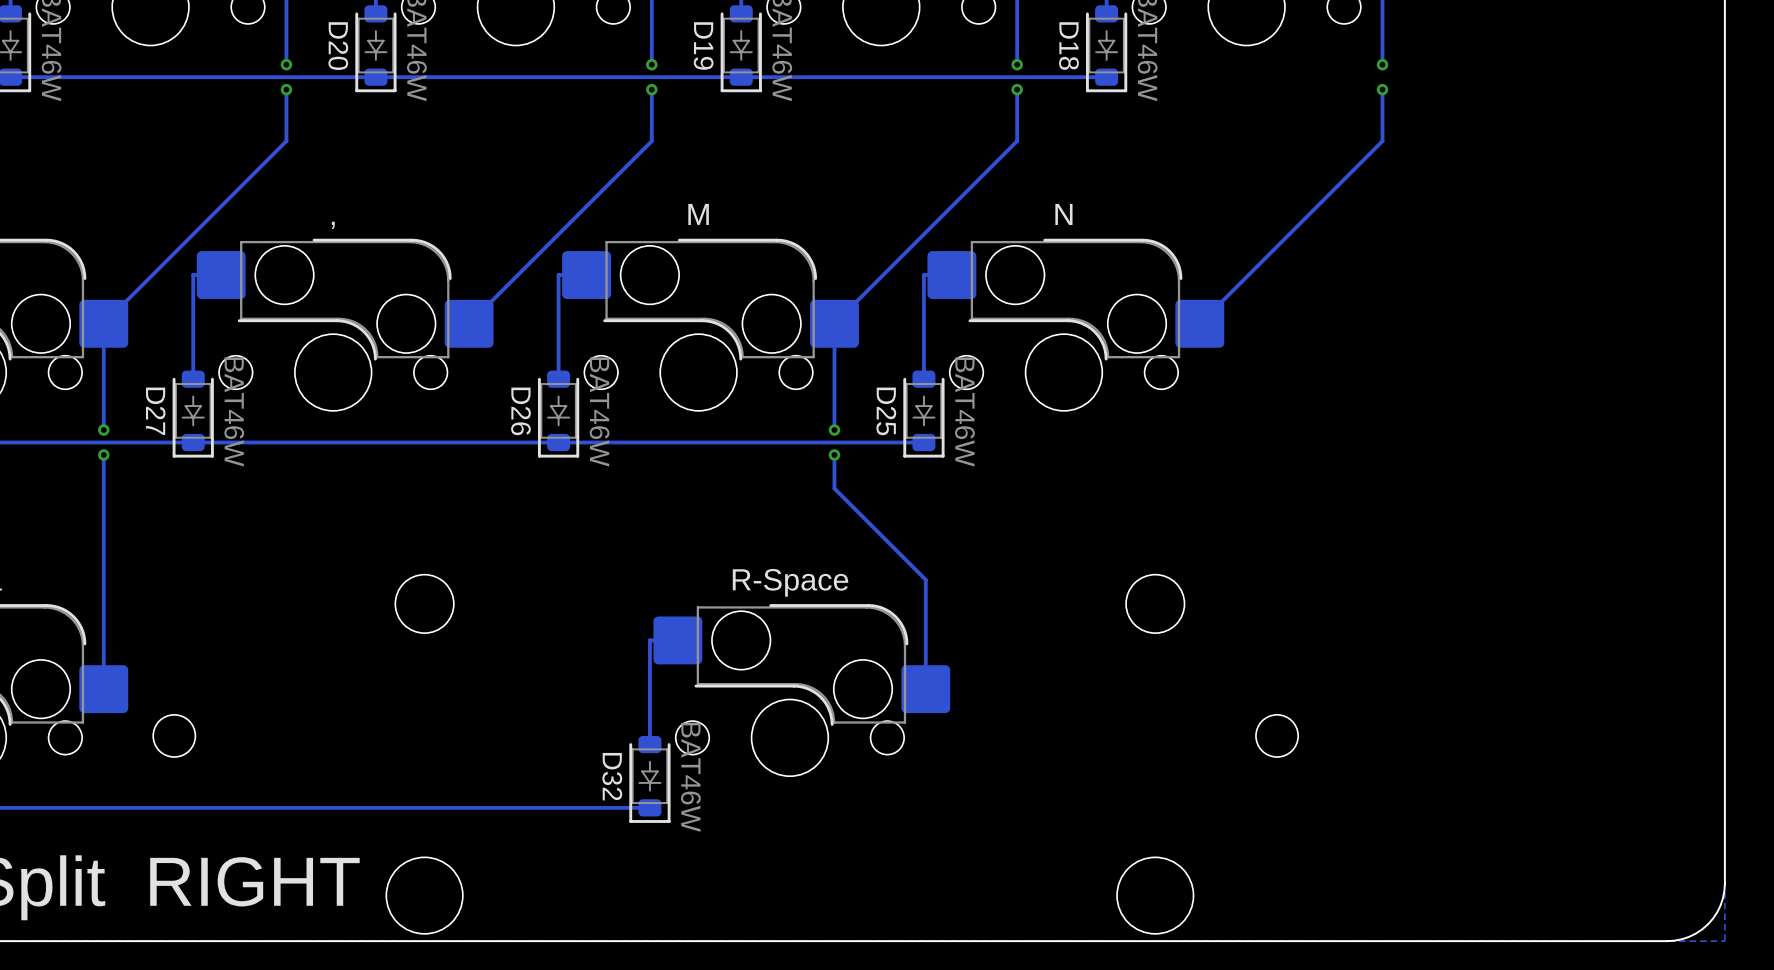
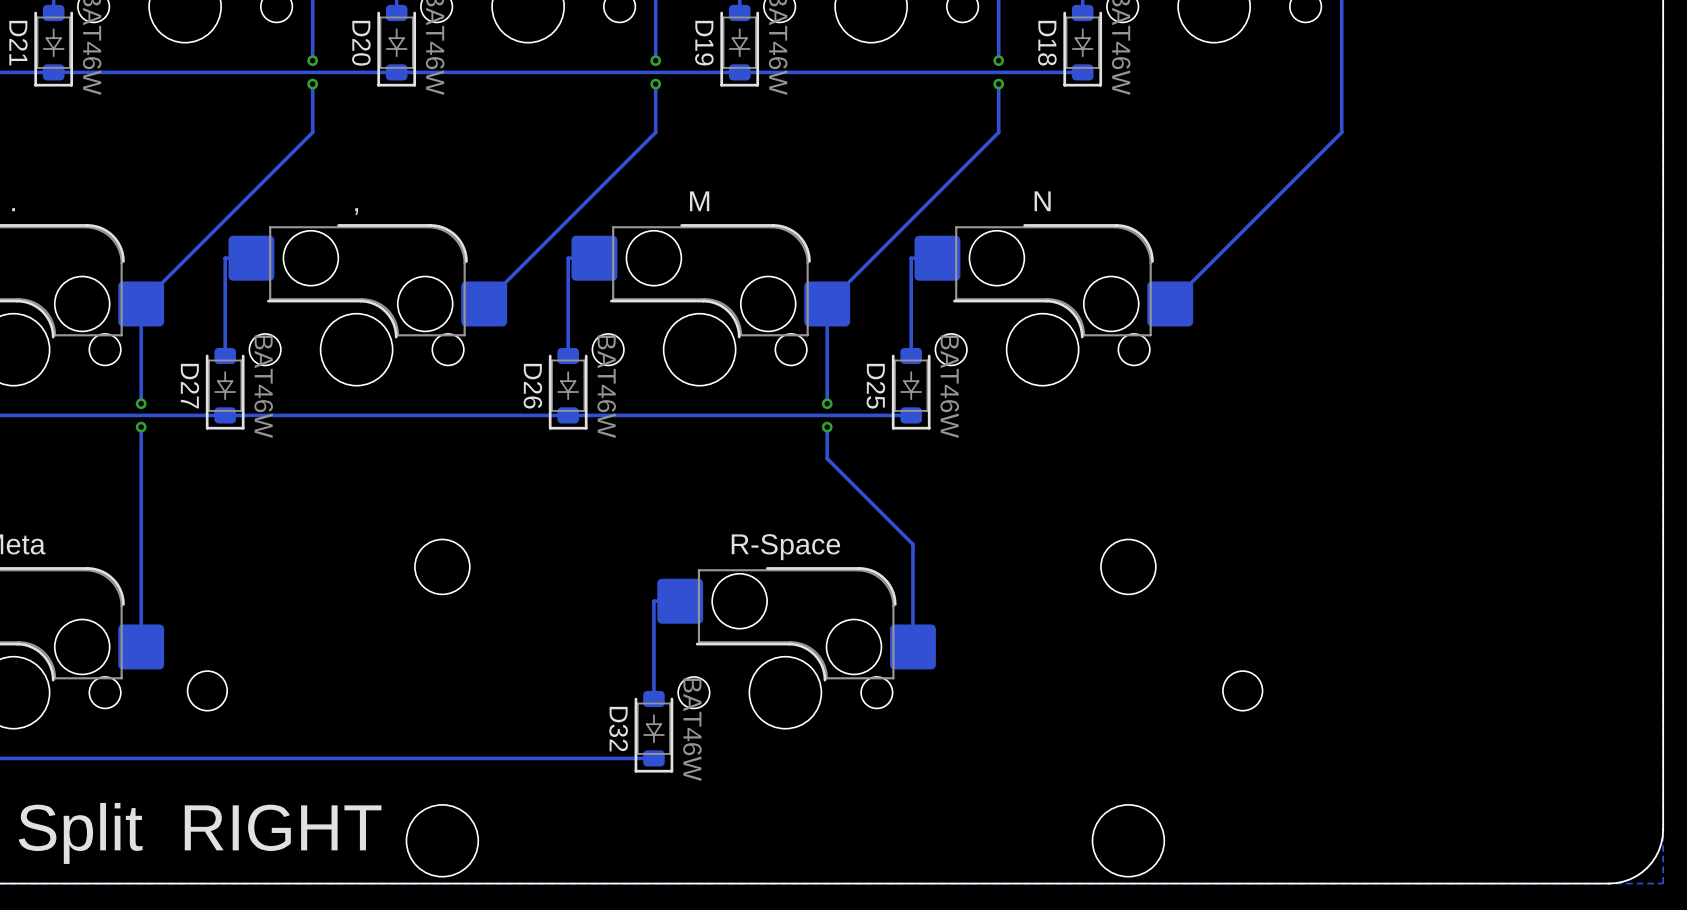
track: none -> (1341, 60) (1341, 84)
via: (1382, 64) -> none
via: (1382, 89) -> none

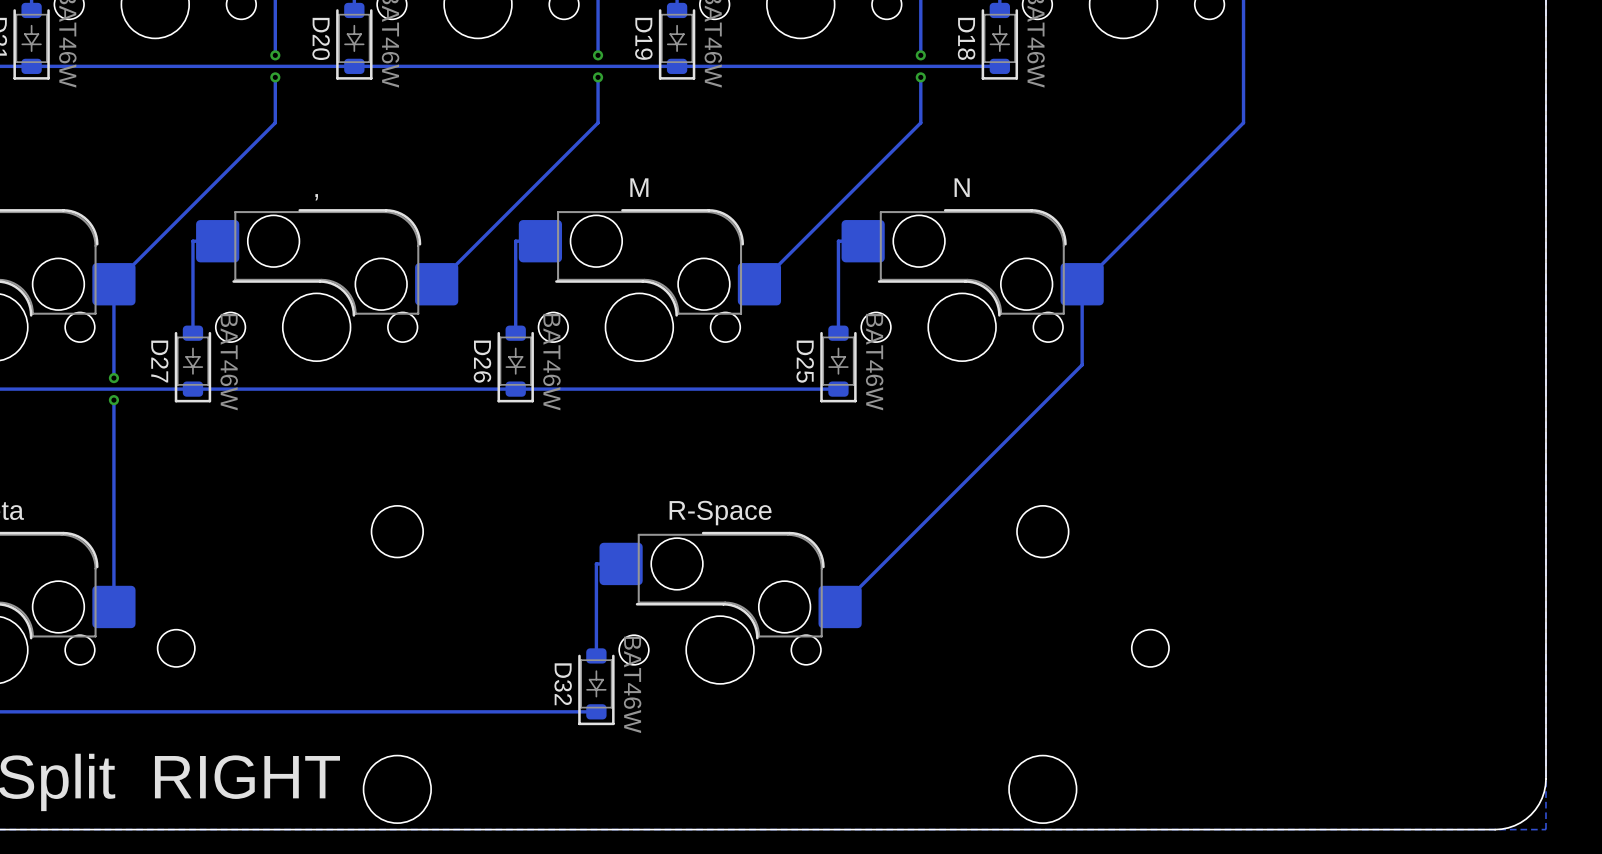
track: (827, 303) (827, 403) -> none
via: (827, 403) -> none
track: (827, 427) (827, 458) (912, 544) (912, 646) -> (1082, 284) (1082, 364) (840, 606)
via: (827, 427) -> none

